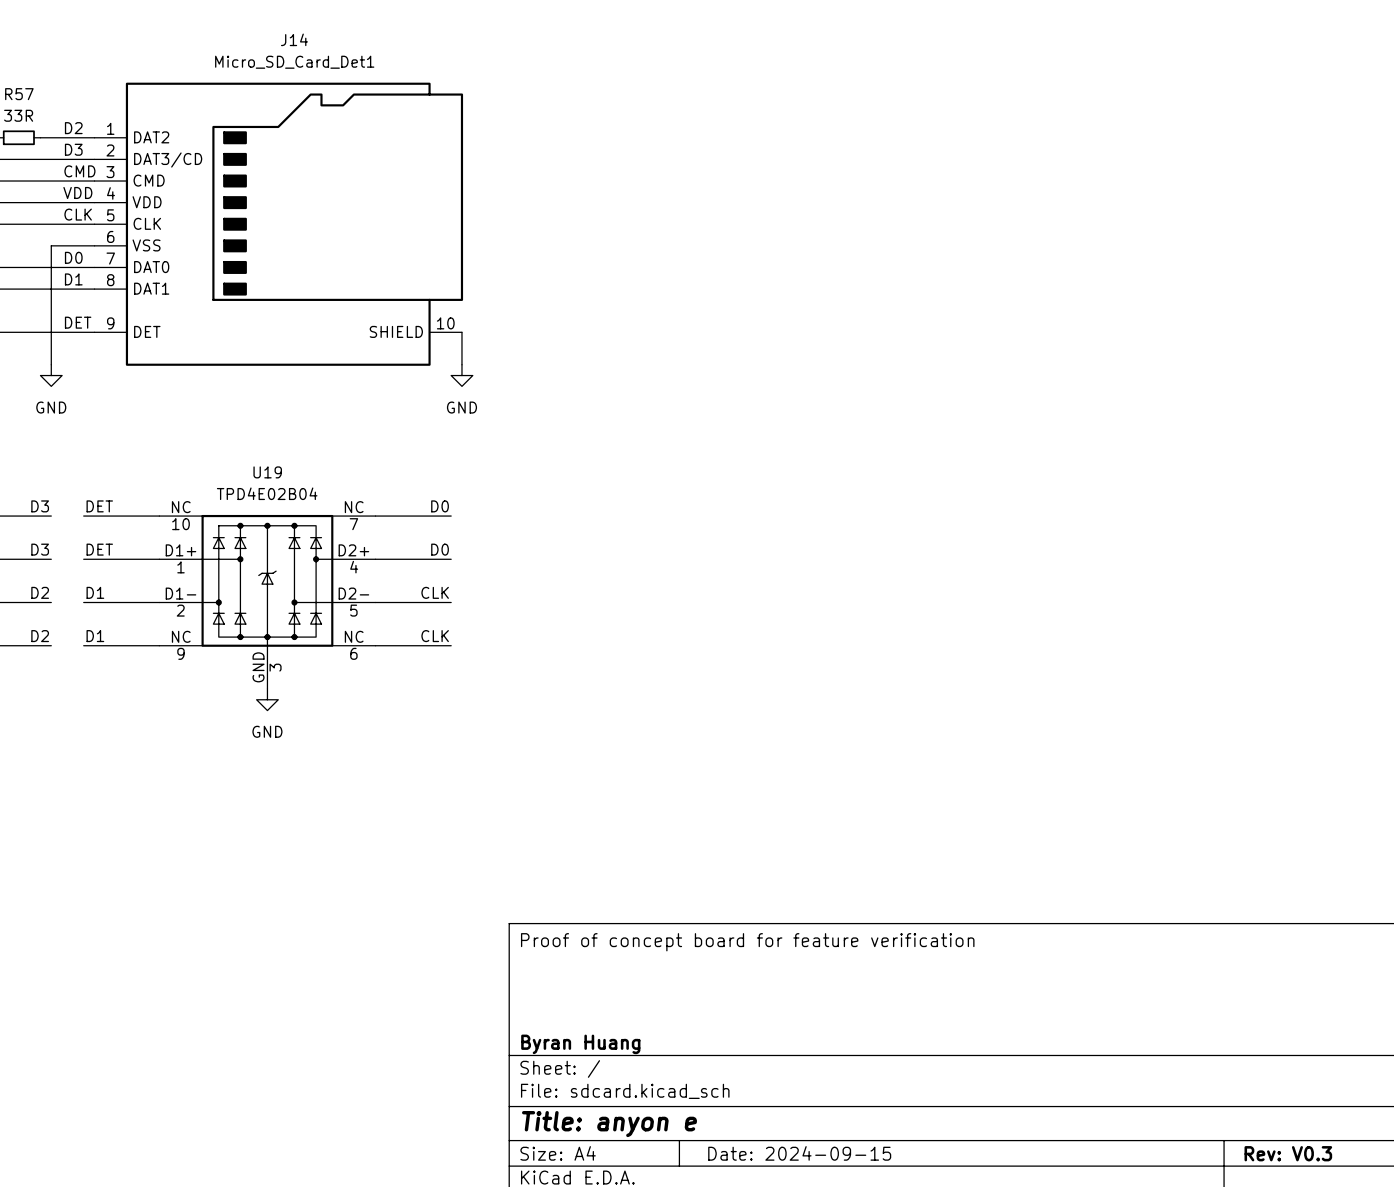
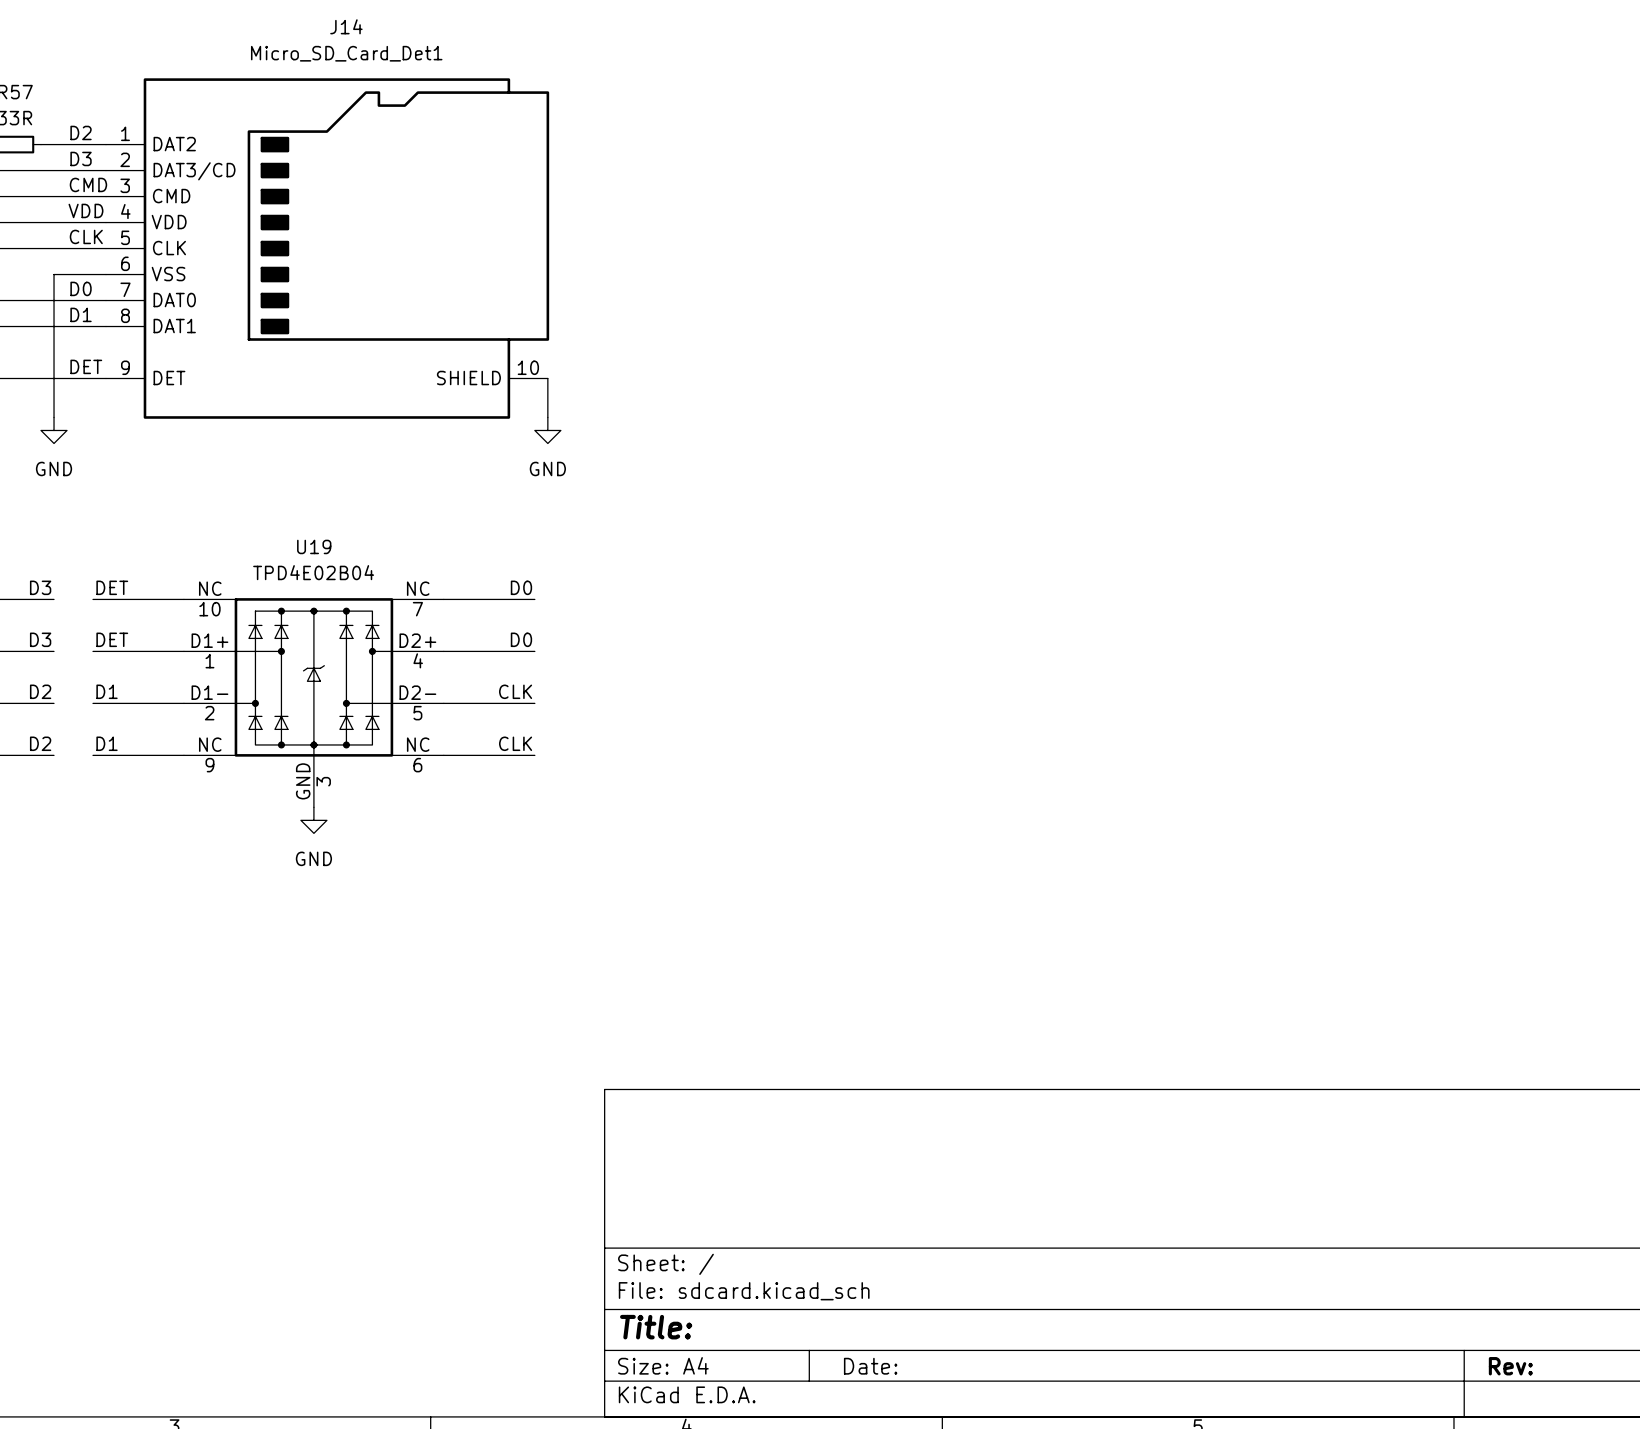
title block: Proof of concept board for feature verification (747, 942) -> none
title block: Byran Huang (580, 1044) -> none
title block: Title: anyon e (609, 1124) -> Title: (656, 1327)
title block: Date: 2024-09-15 (799, 1153) -> Date: (870, 1366)
title block: Rev: V0.3 (1288, 1153) -> Rev: (1510, 1366)

